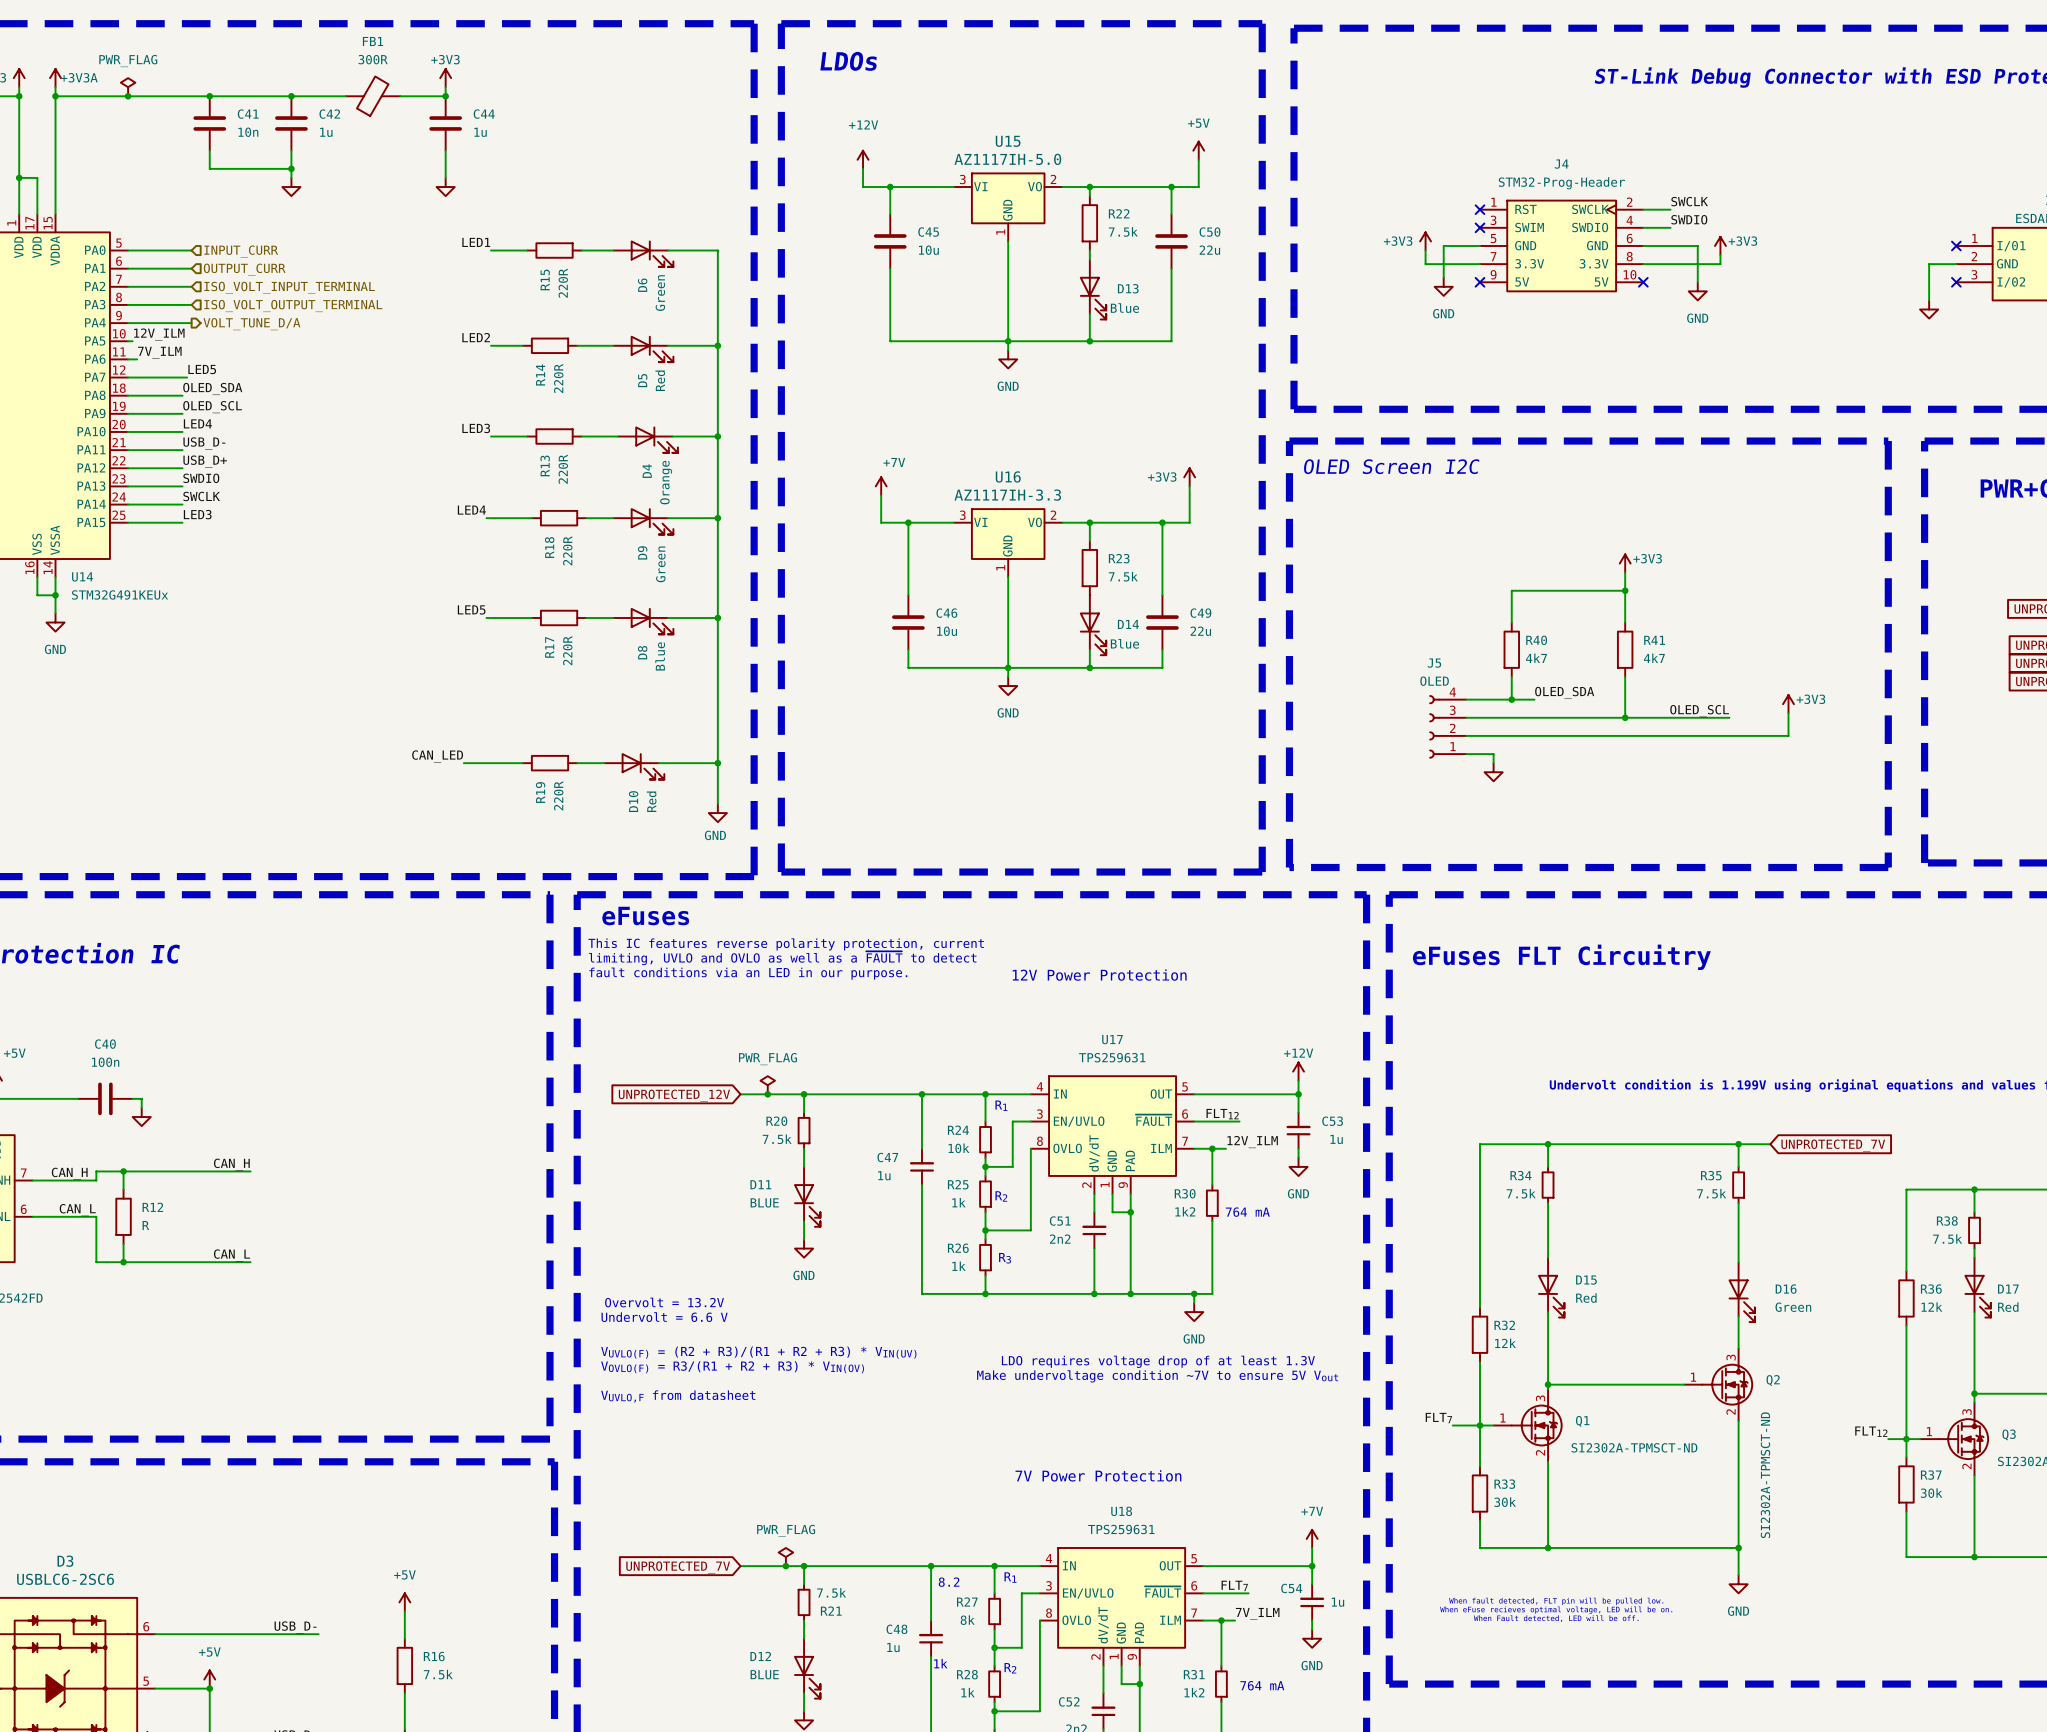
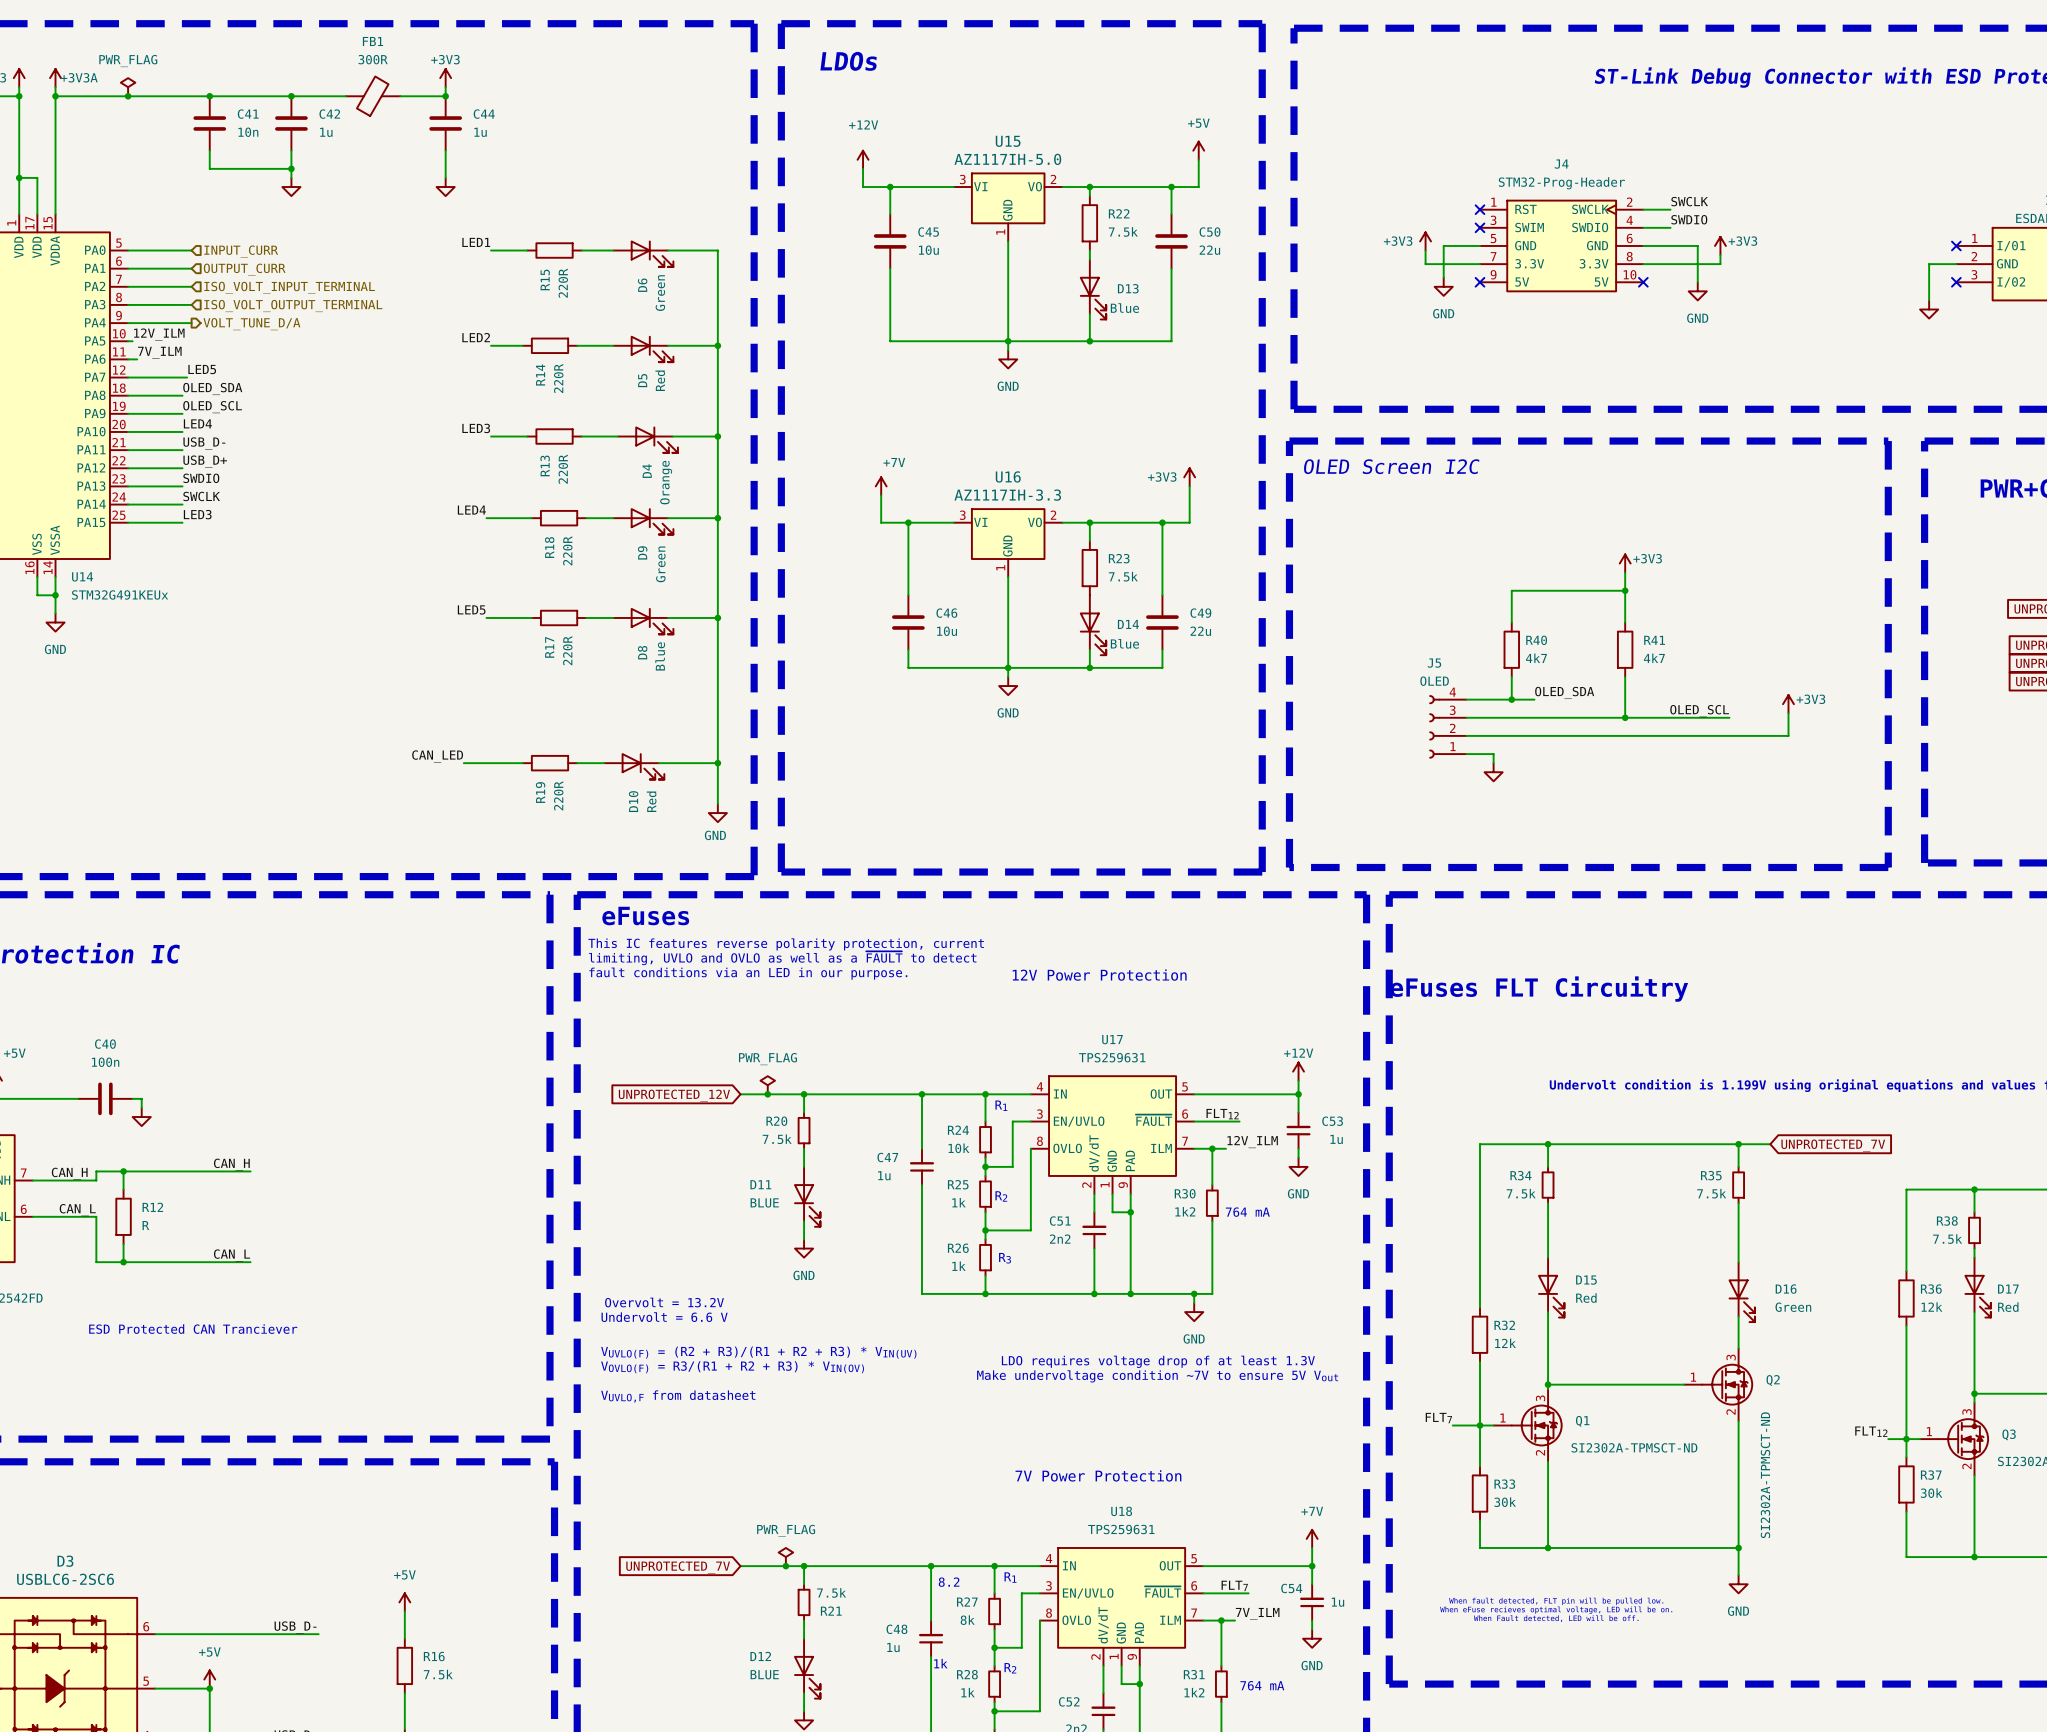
text position: eFuses FLT Circuitry (1561, 957) -> eFuses FLT Circuitry (1539, 989)
text: none -> ESD Protected CAN Tranciever (193, 1329)

